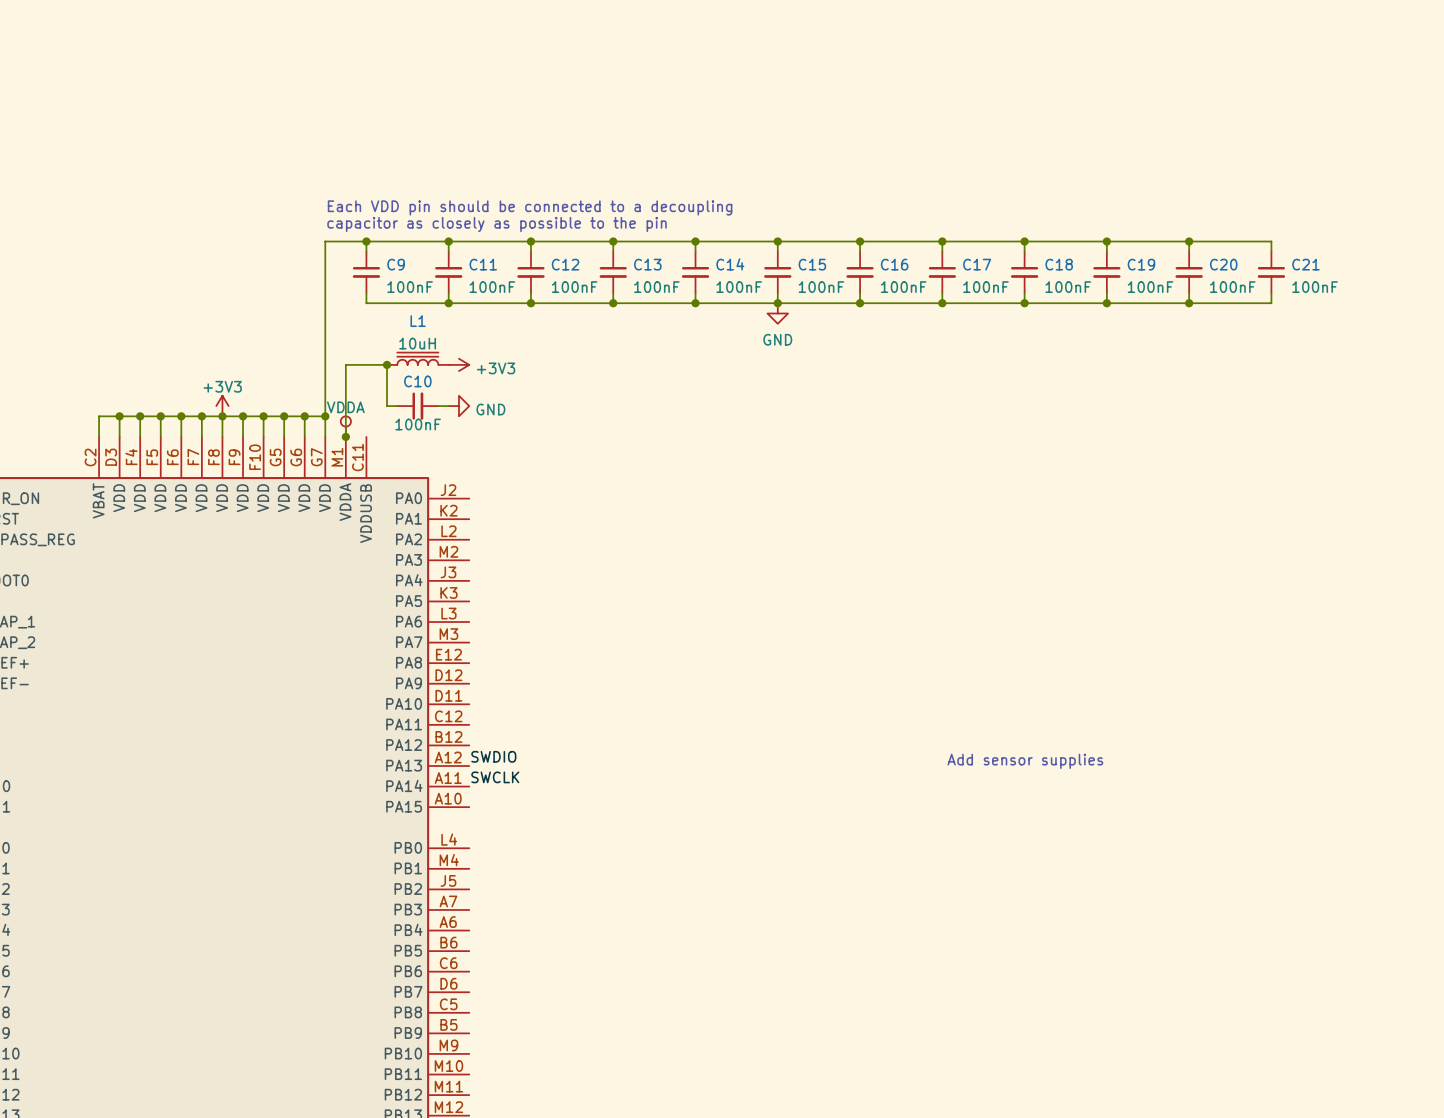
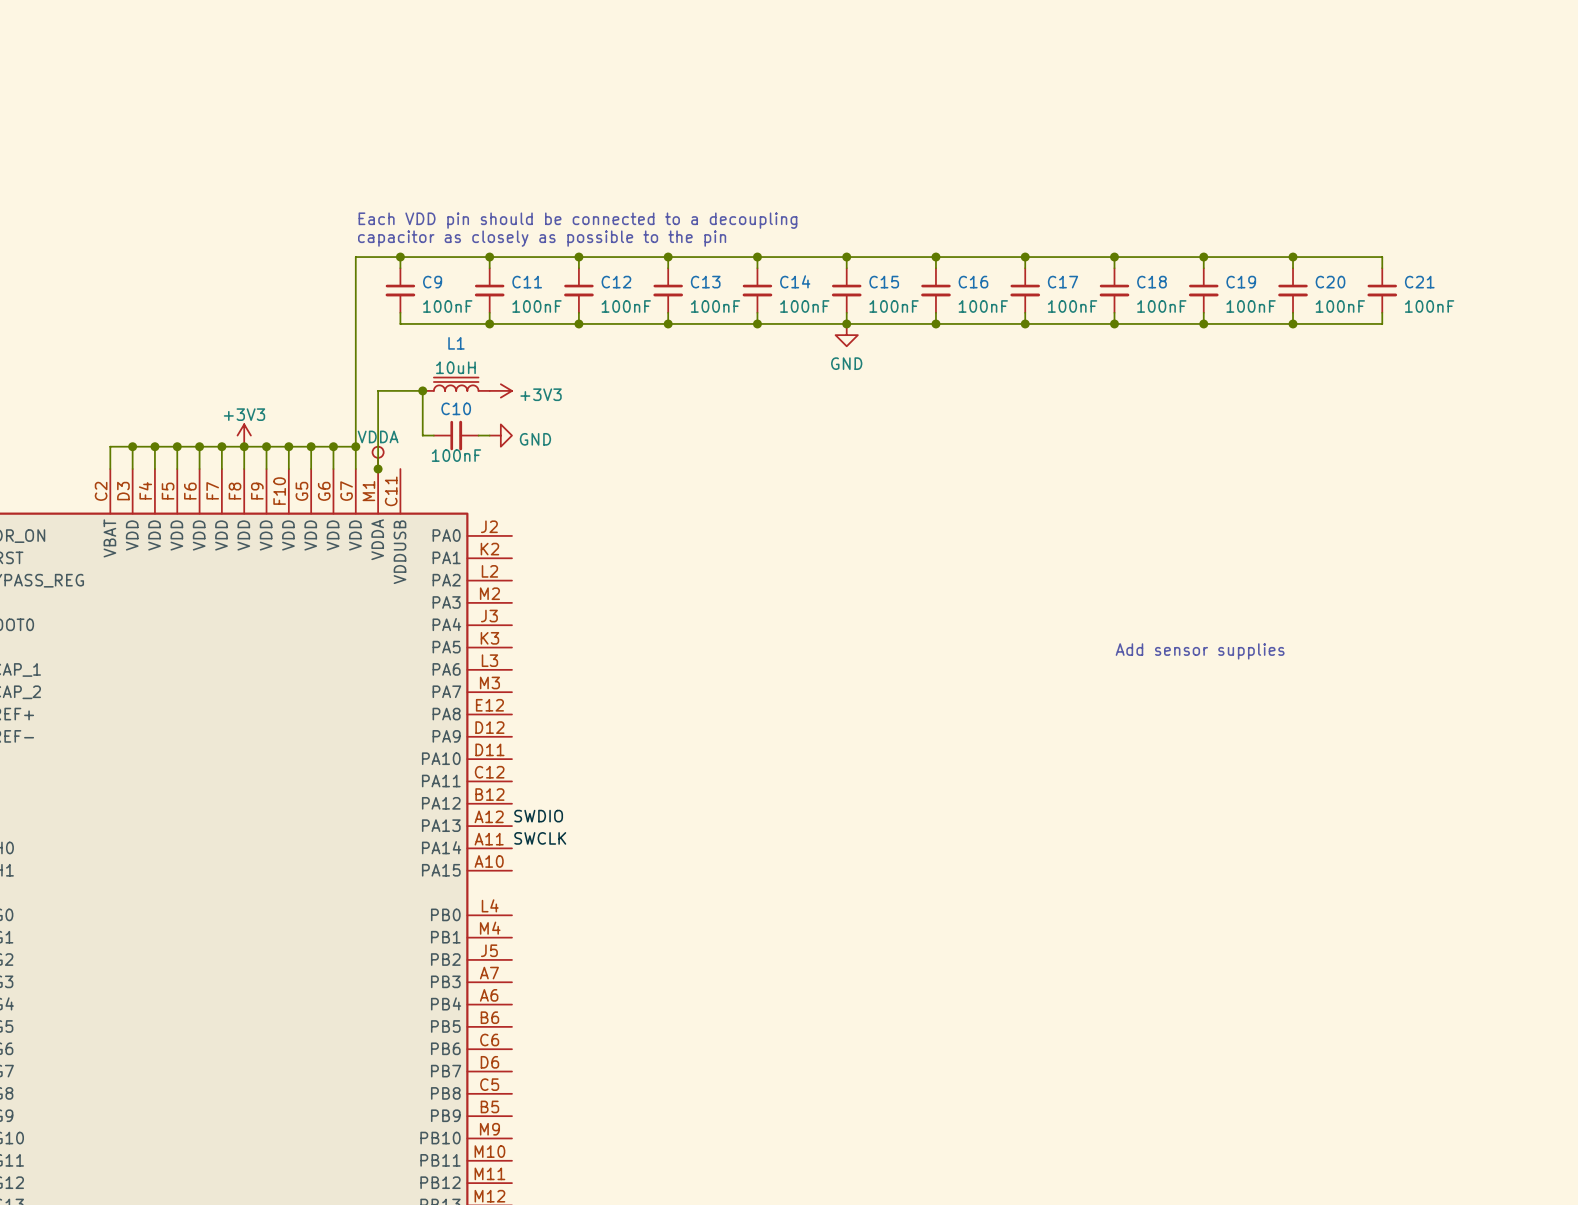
text position: Add sensor supplies (1025, 761) -> Add sensor supplies (1200, 651)

